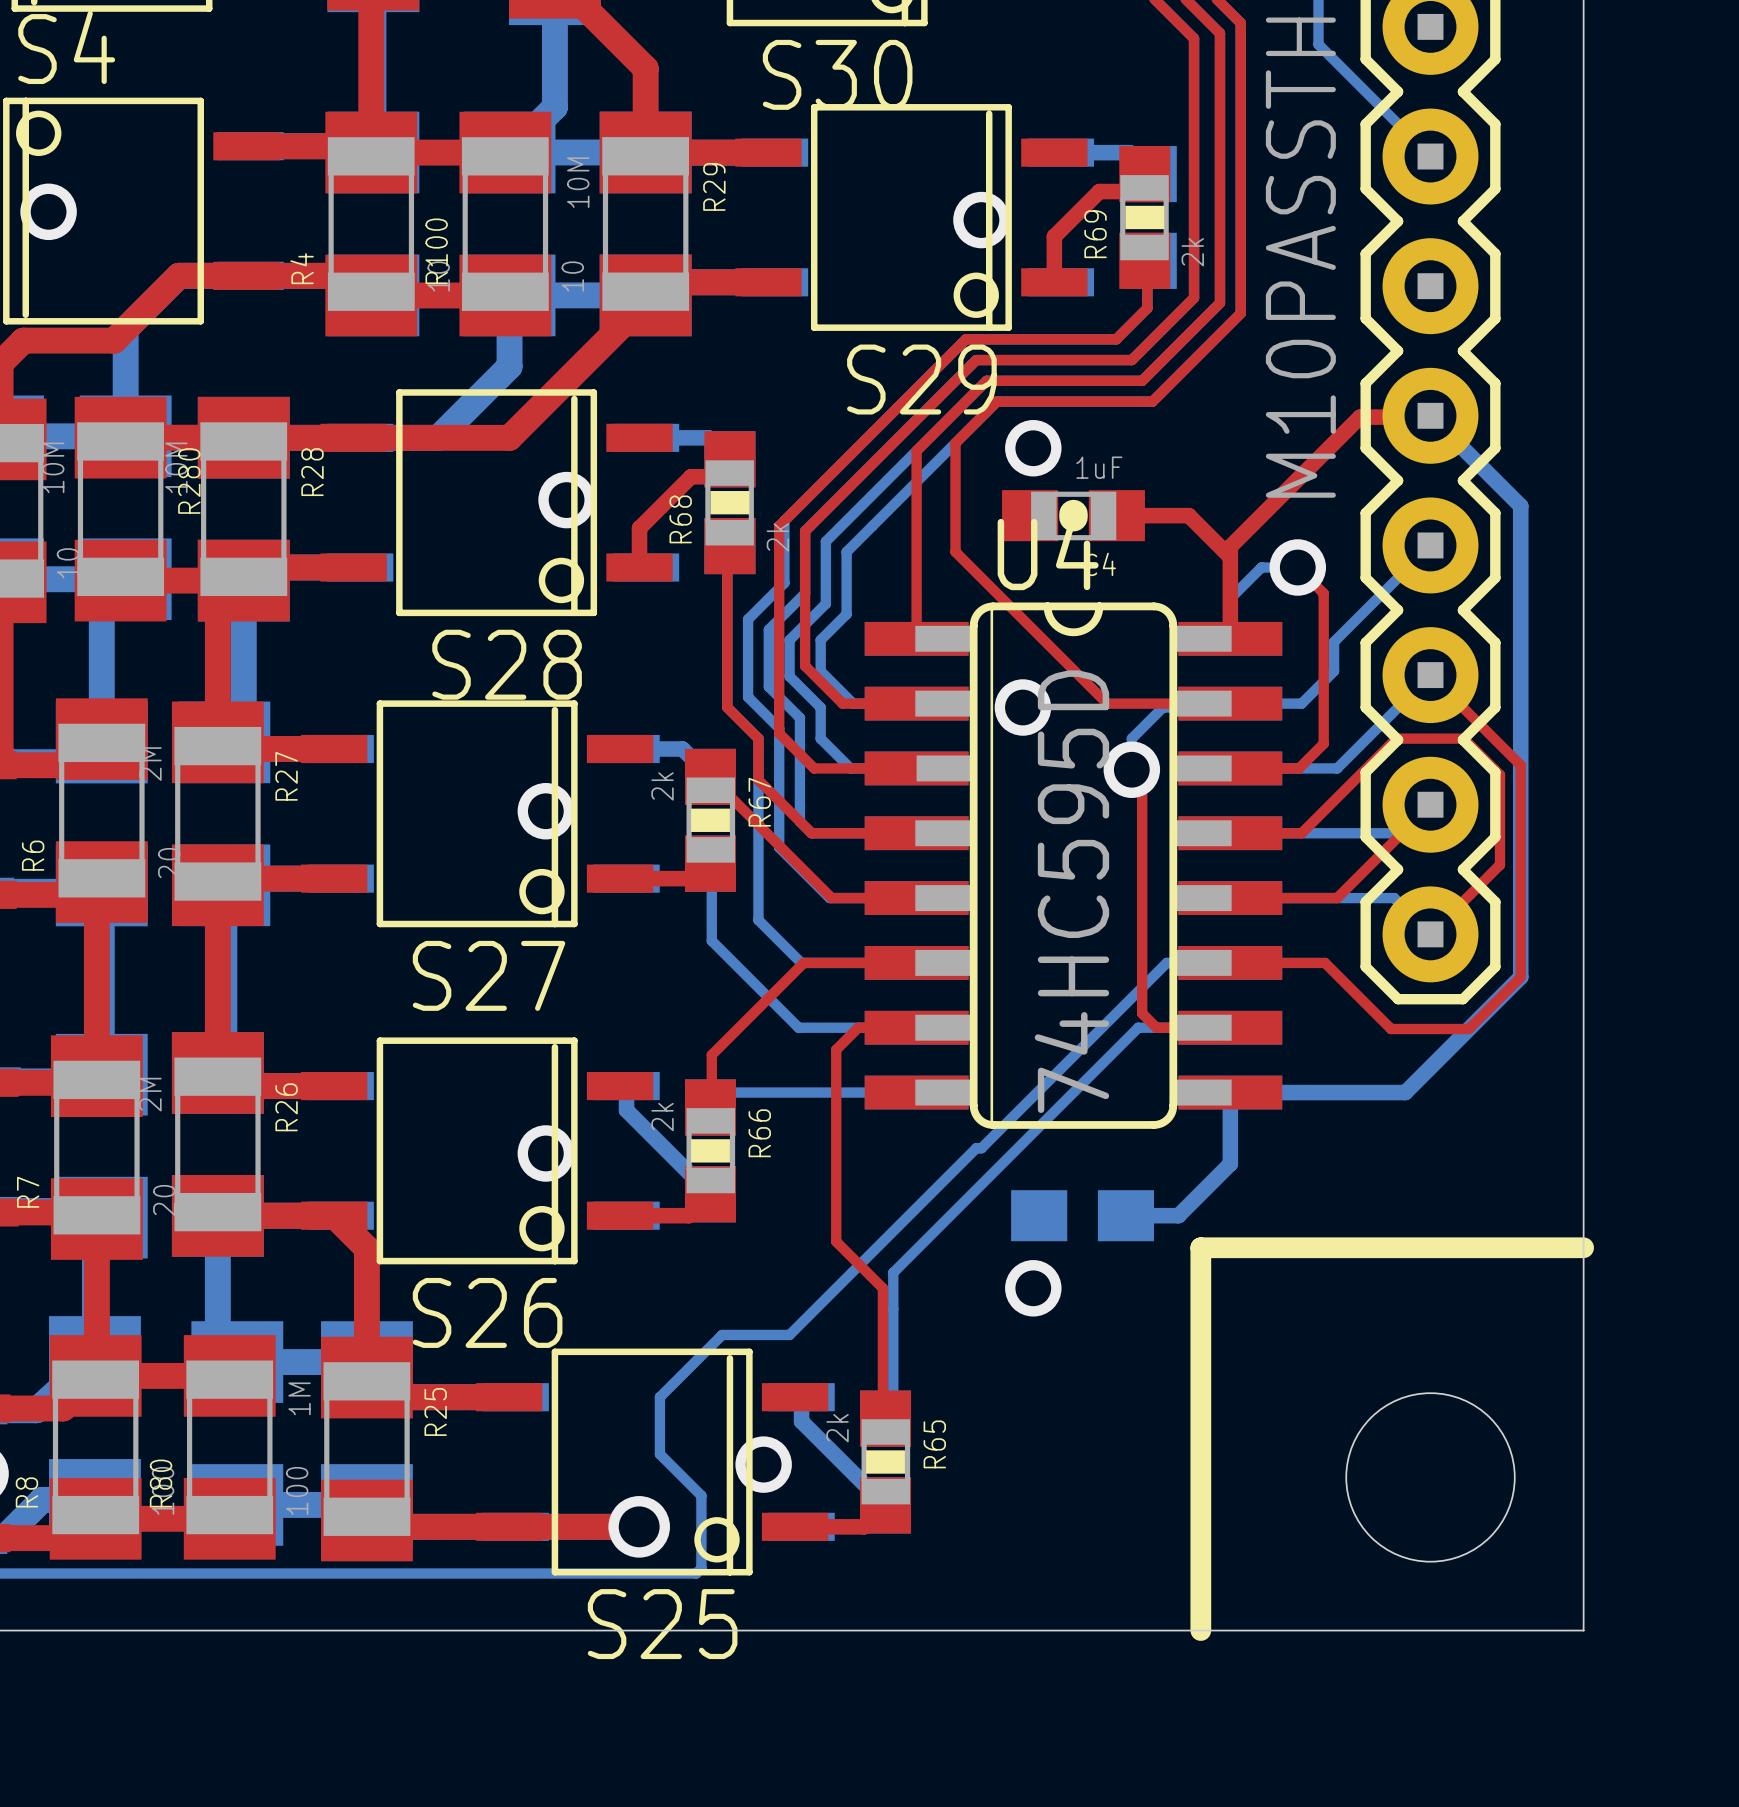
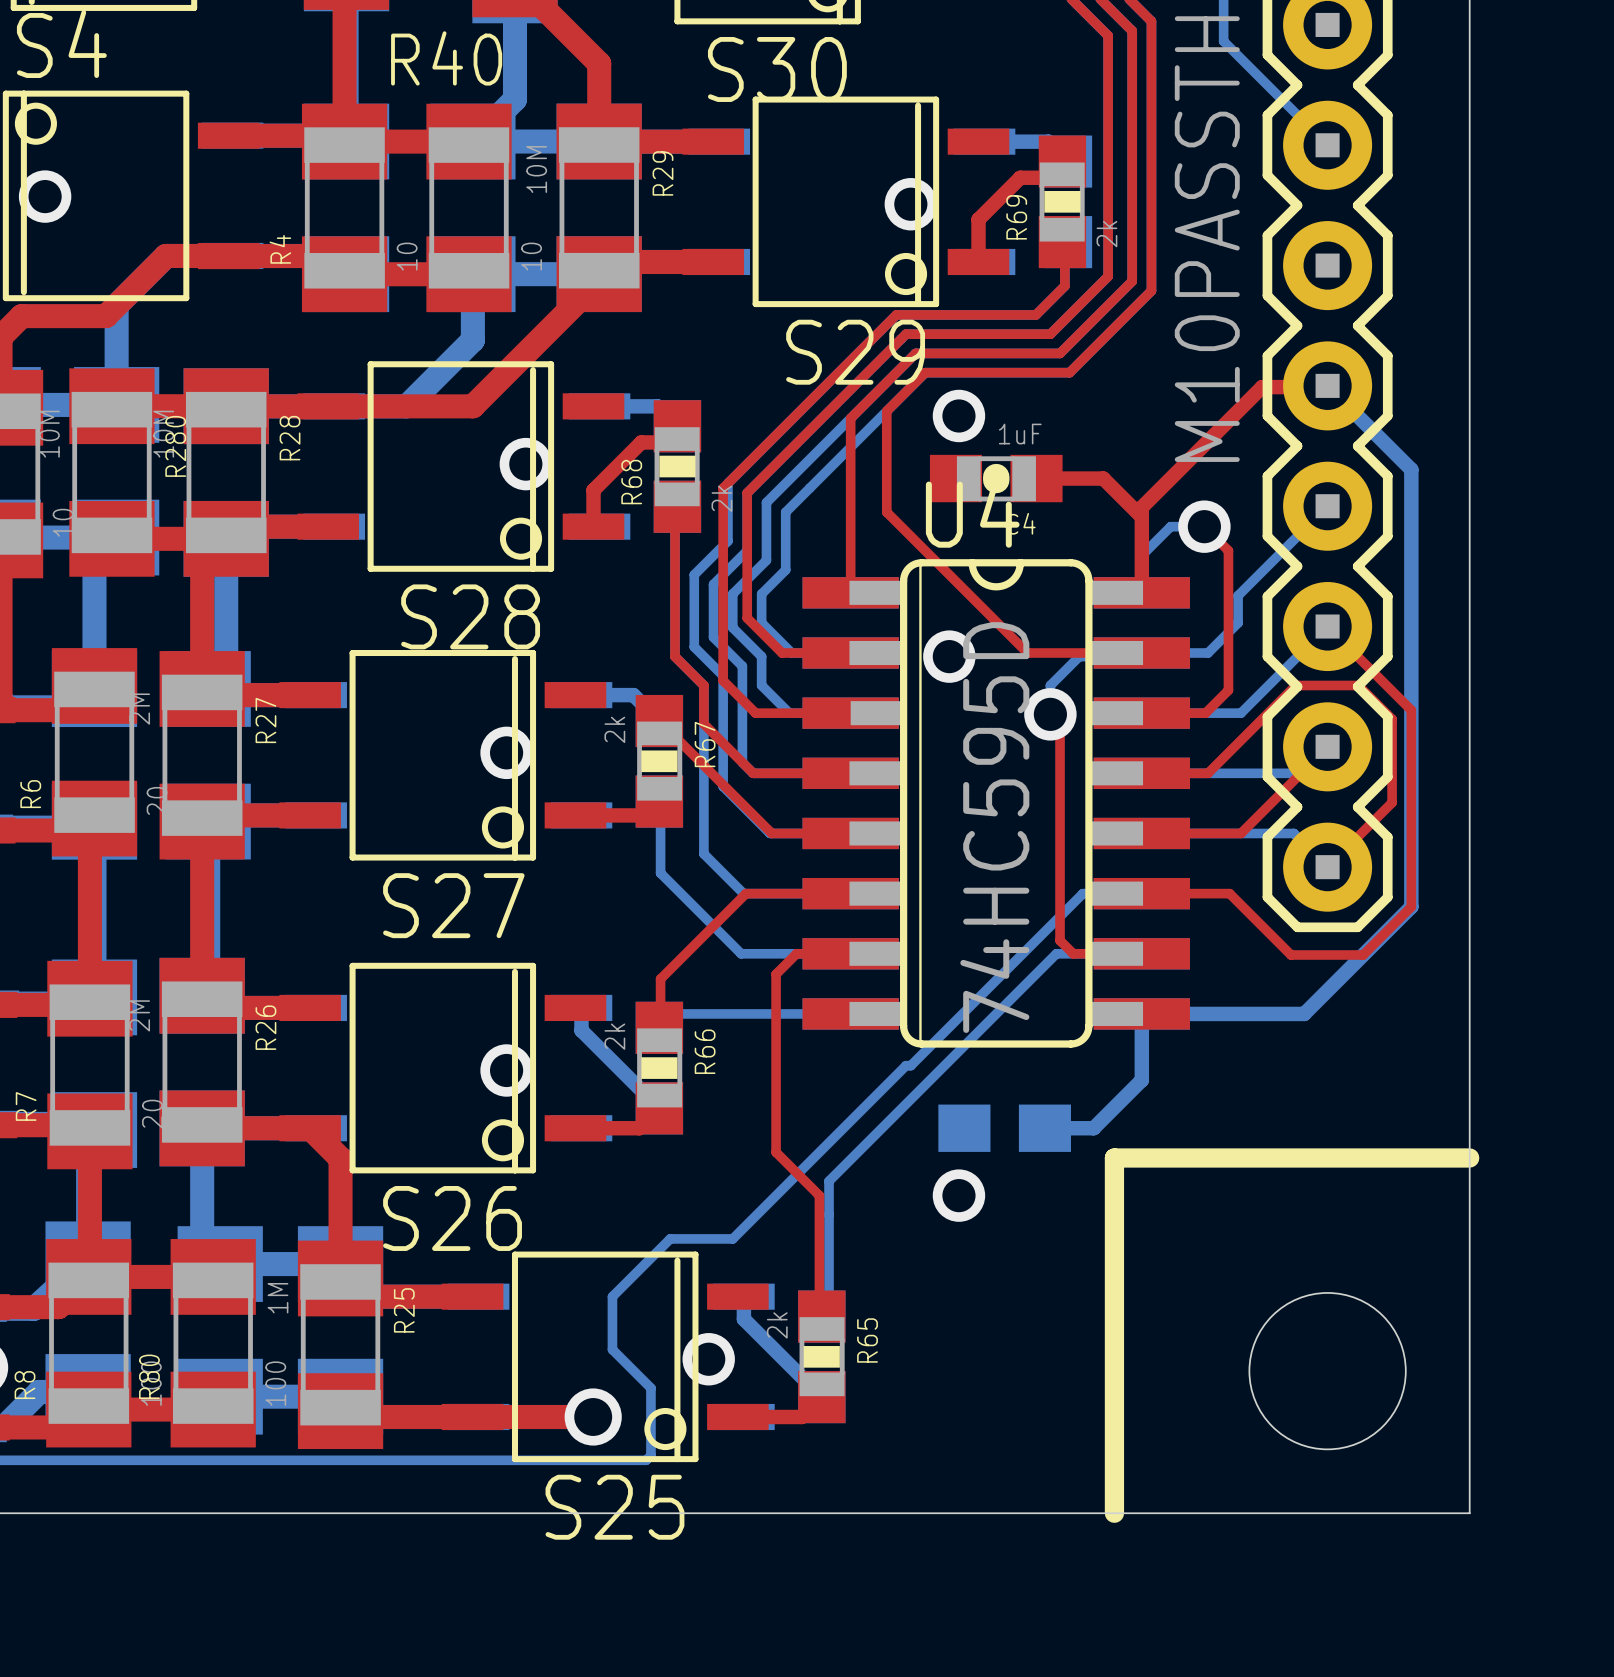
R100 name: R100 (436, 251) -> R40 (446, 58)

